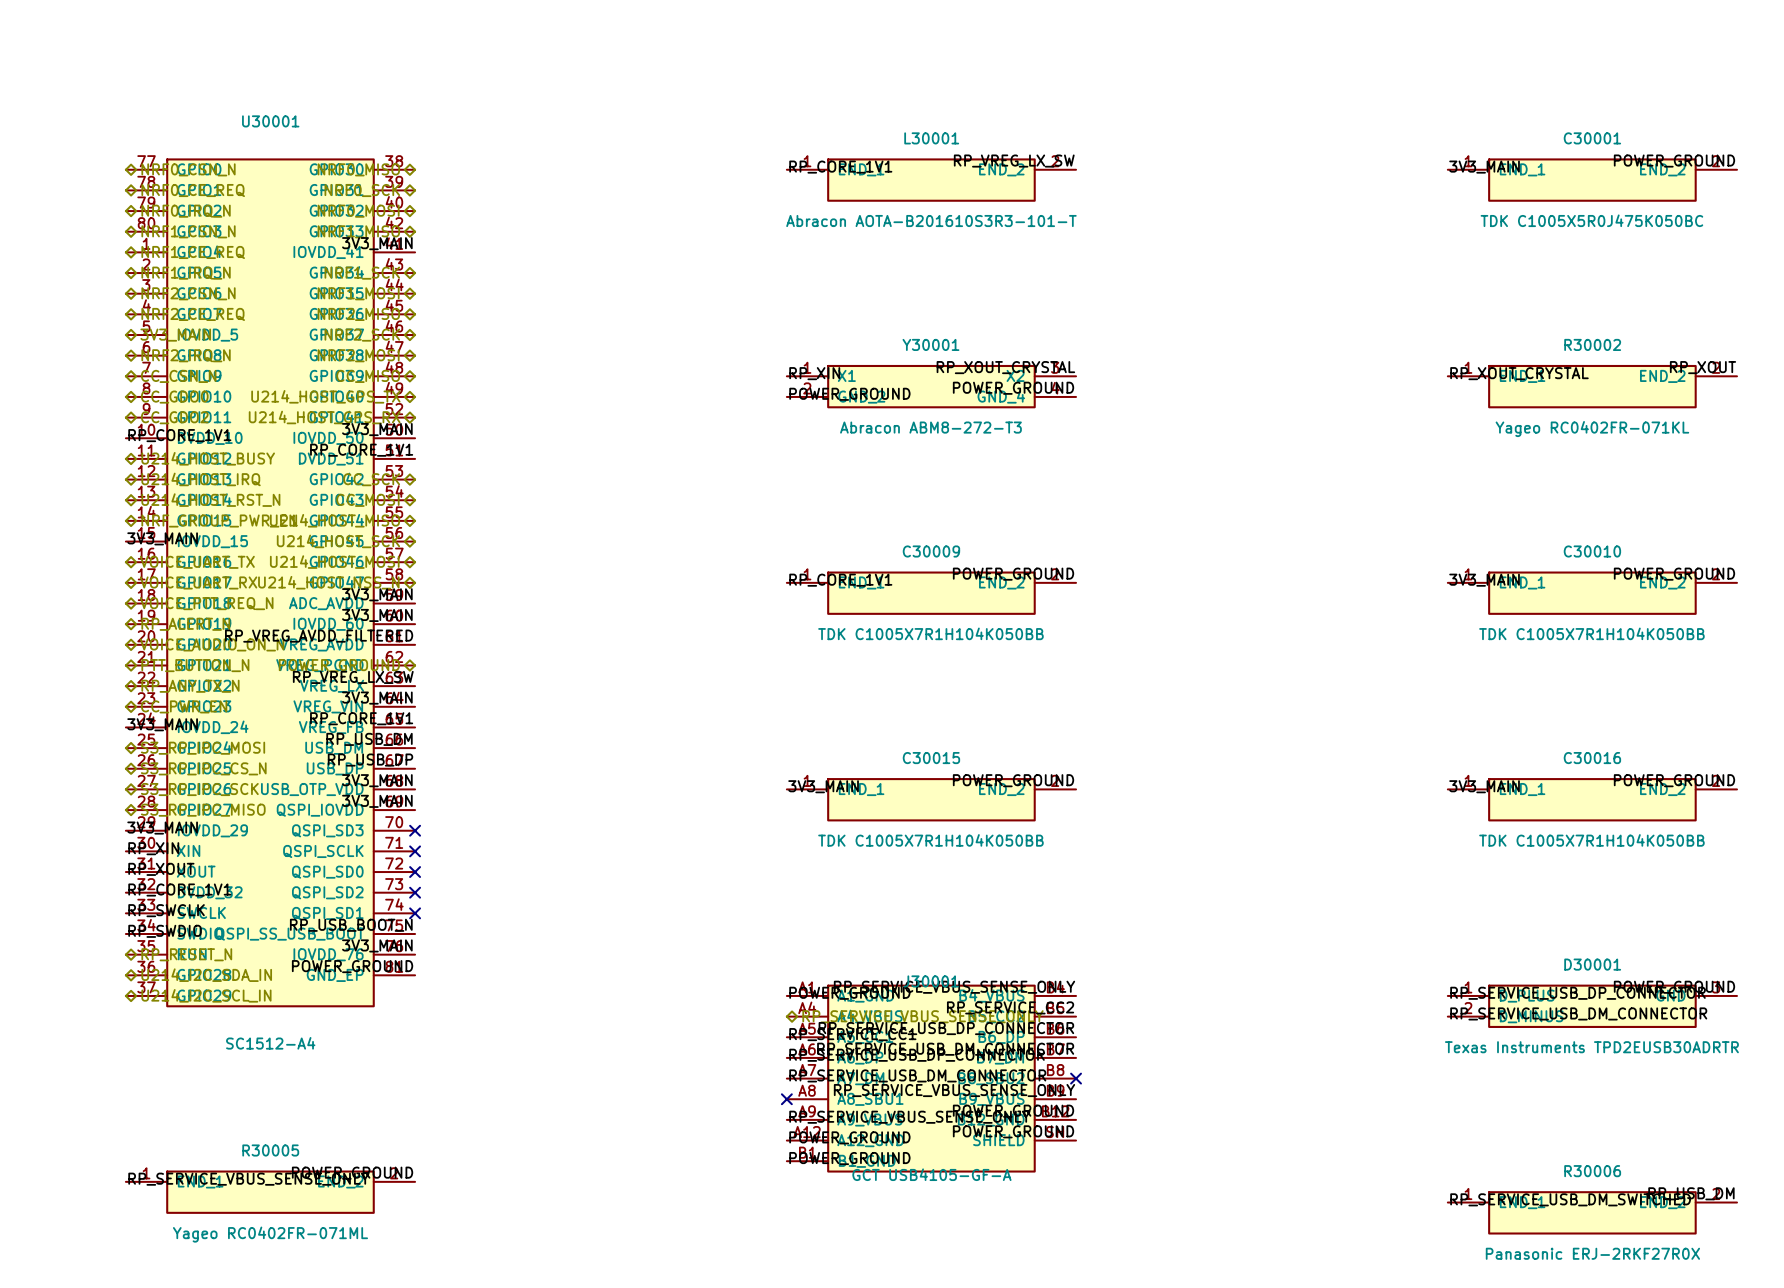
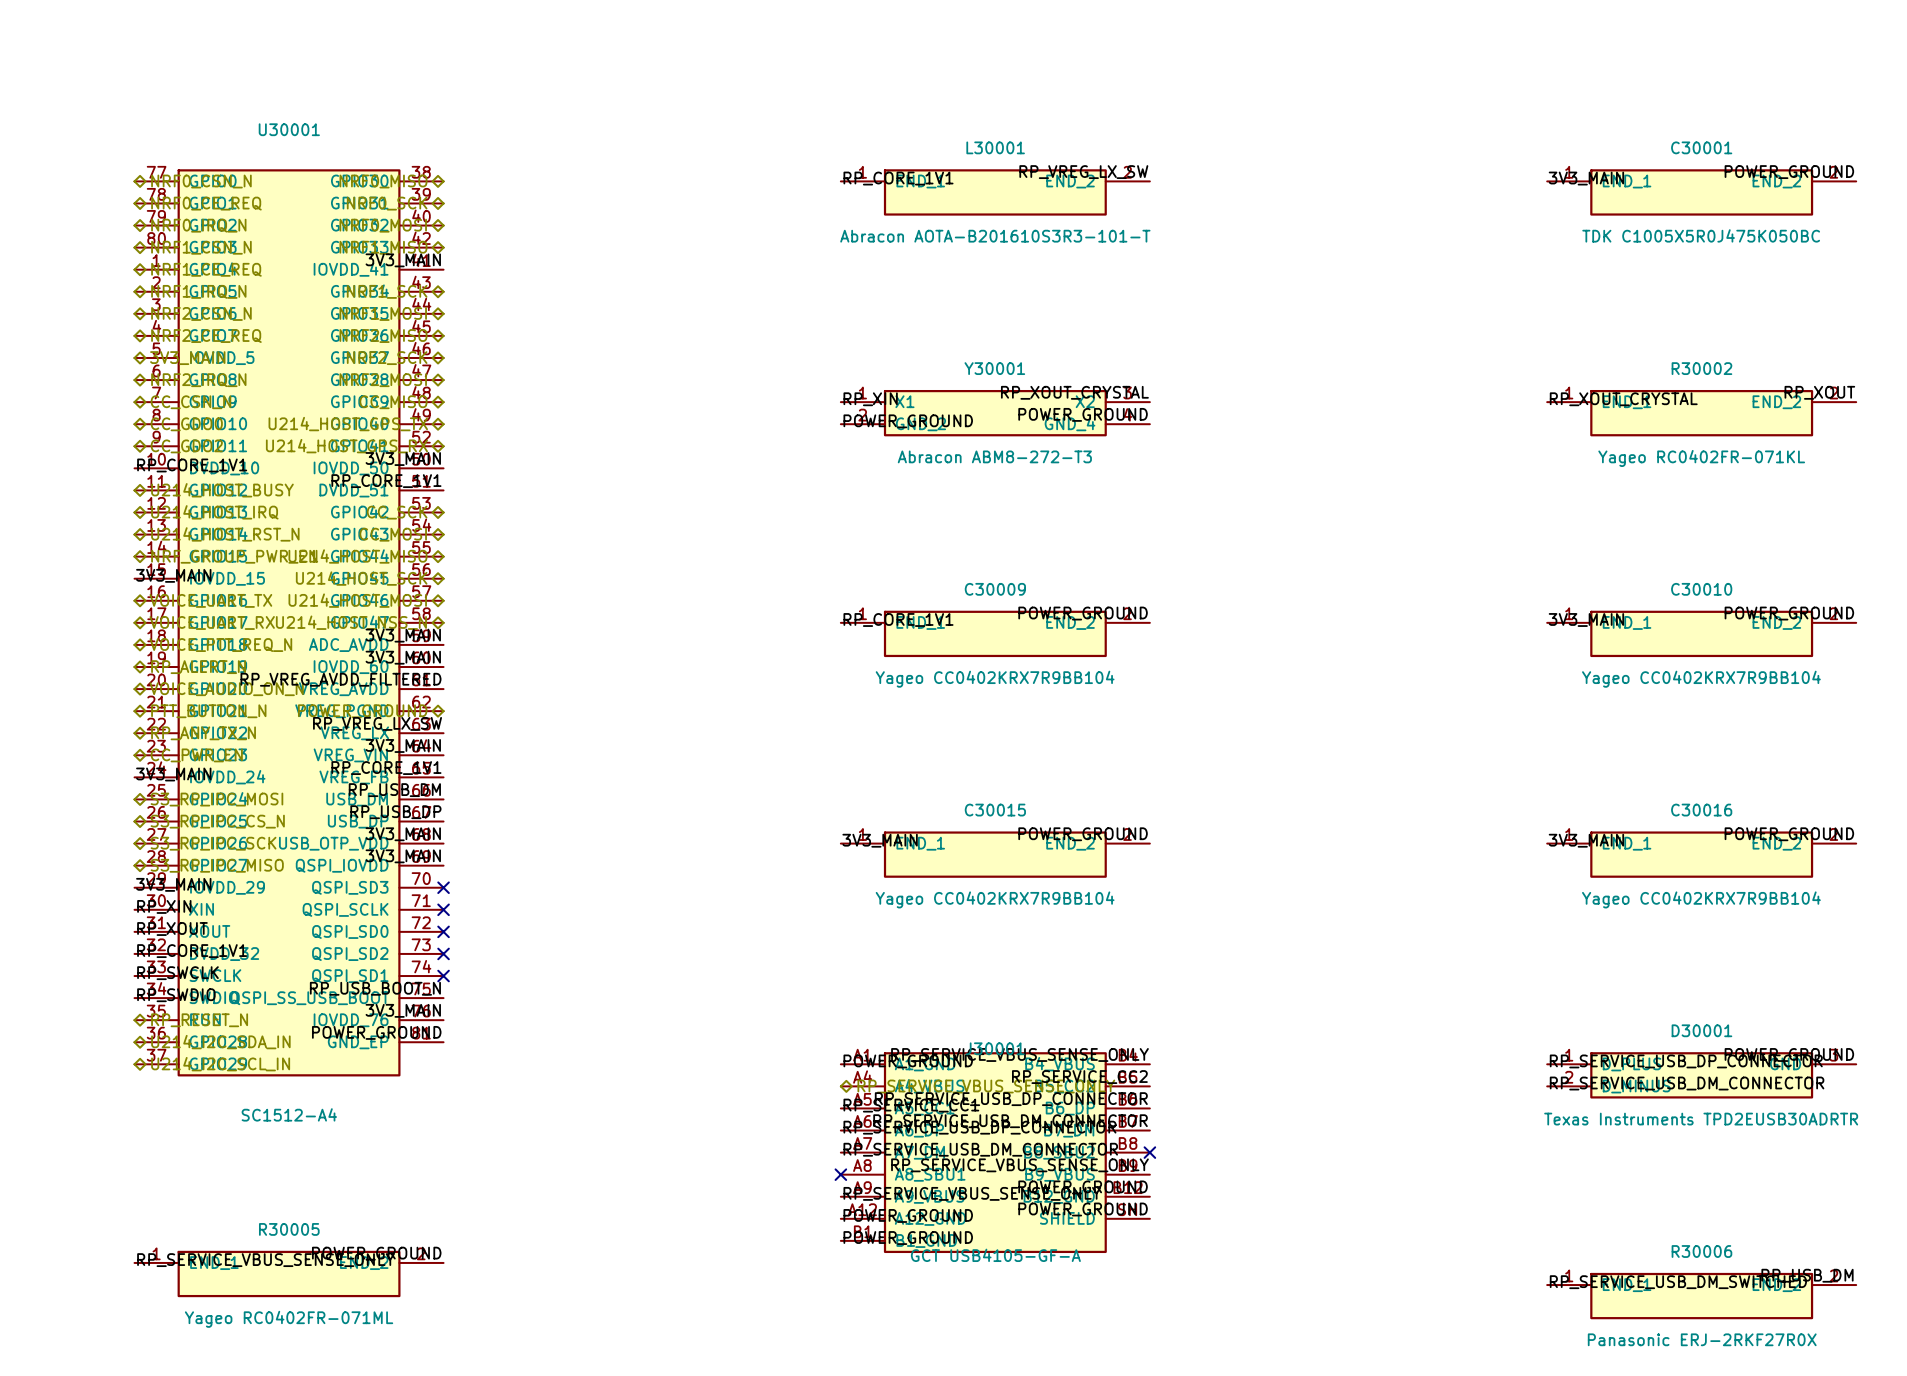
C30009 value: TDK C1005X7R1H104K050BB (930, 633) -> Yageo CC0402KRX7R9BB104 (995, 679)
C30010 value: TDK C1005X7R1H104K050BB (1591, 633) -> Yageo CC0402KRX7R9BB104 (1701, 679)
C30015 value: TDK C1005X7R1H104K050BB (930, 840) -> Yageo CC0402KRX7R9BB104 (995, 899)
C30016 value: TDK C1005X7R1H104K050BB (1591, 840) -> Yageo CC0402KRX7R9BB104 (1701, 899)

